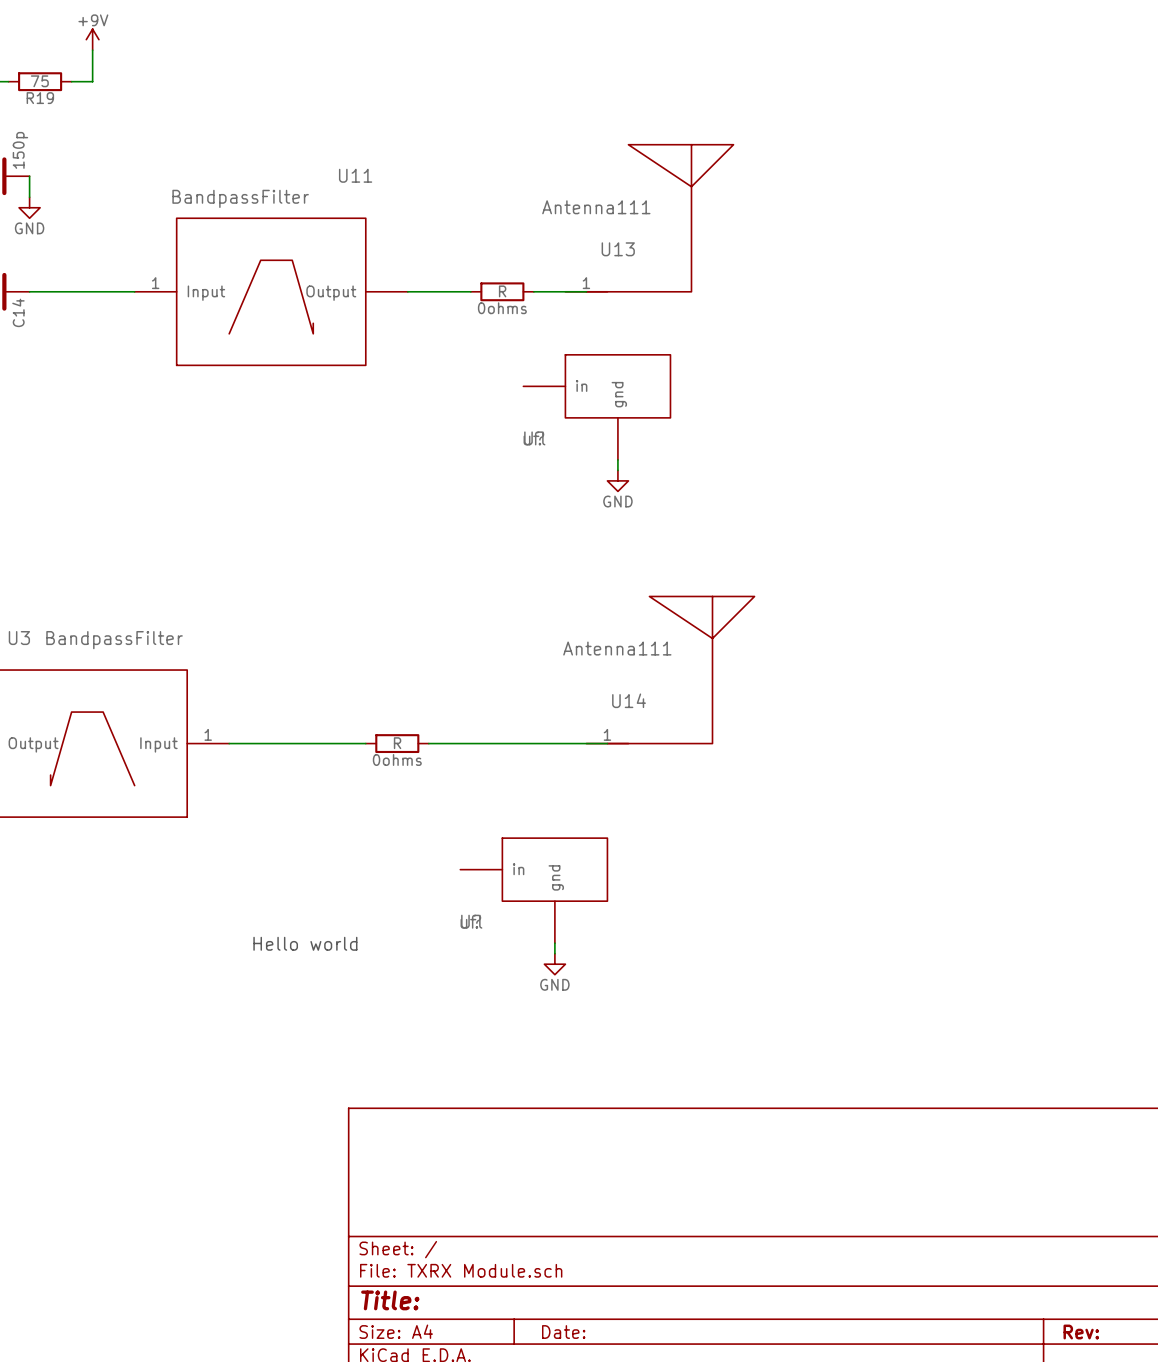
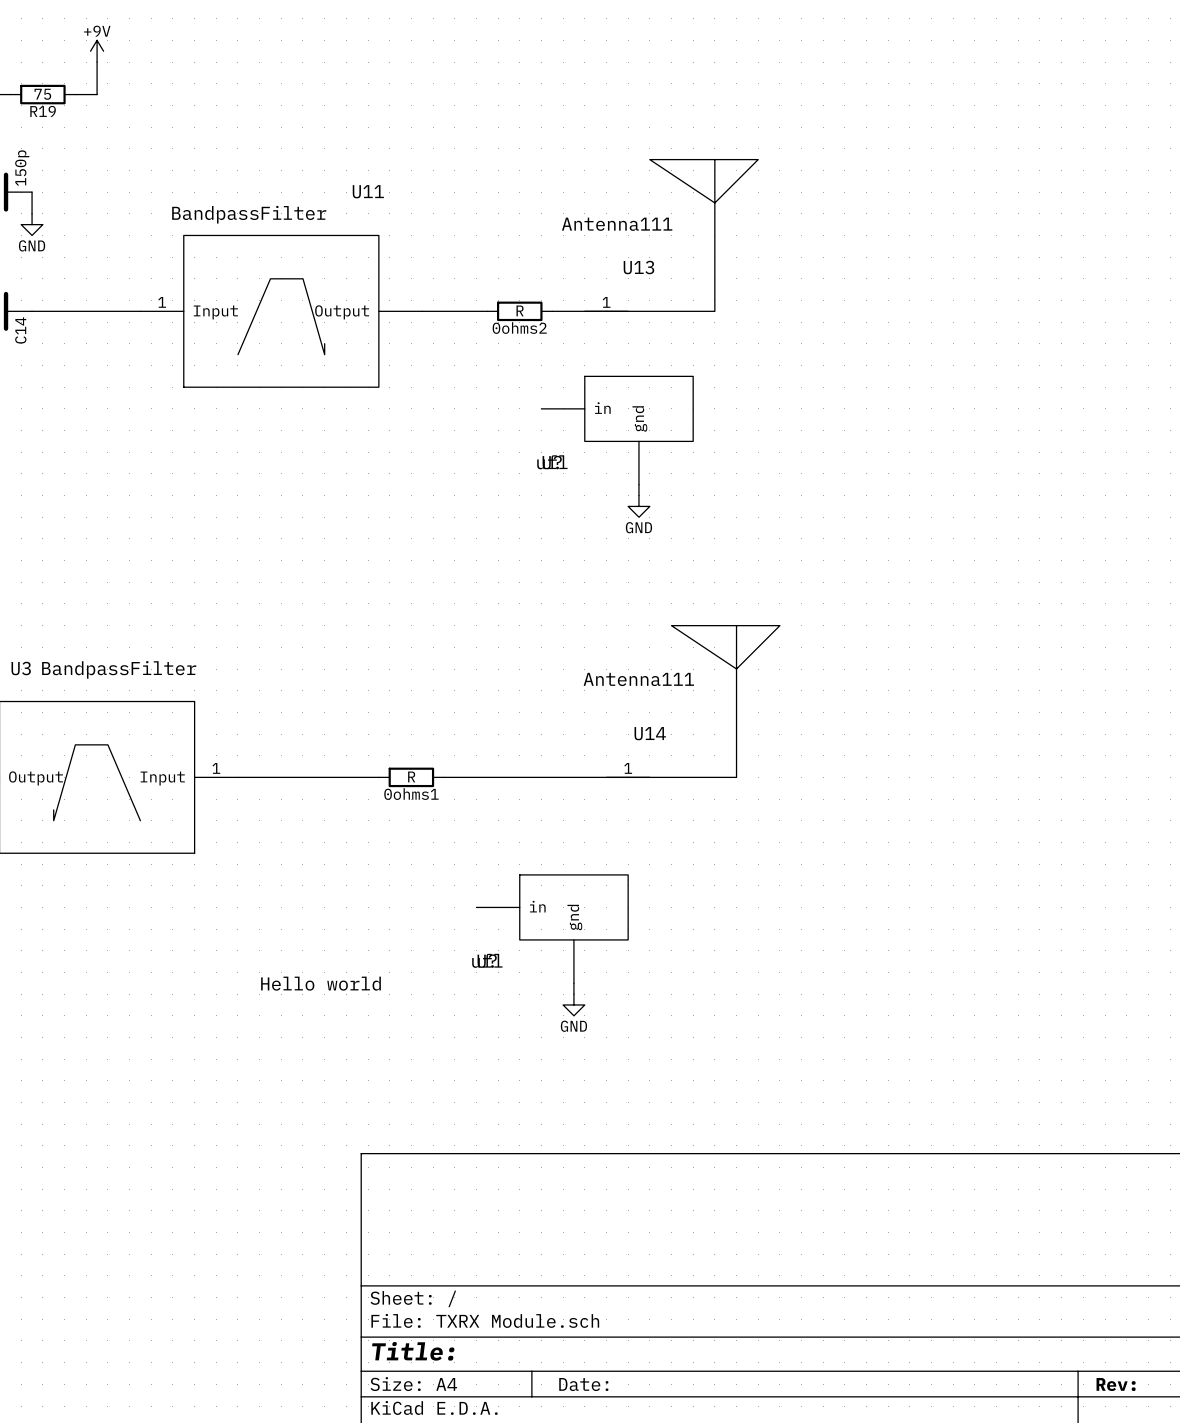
0ohms name: 0ohms (502, 308) -> 0ohms2 (519, 328)
0ohms name: 0ohms (397, 759) -> 0ohms1 (411, 794)

